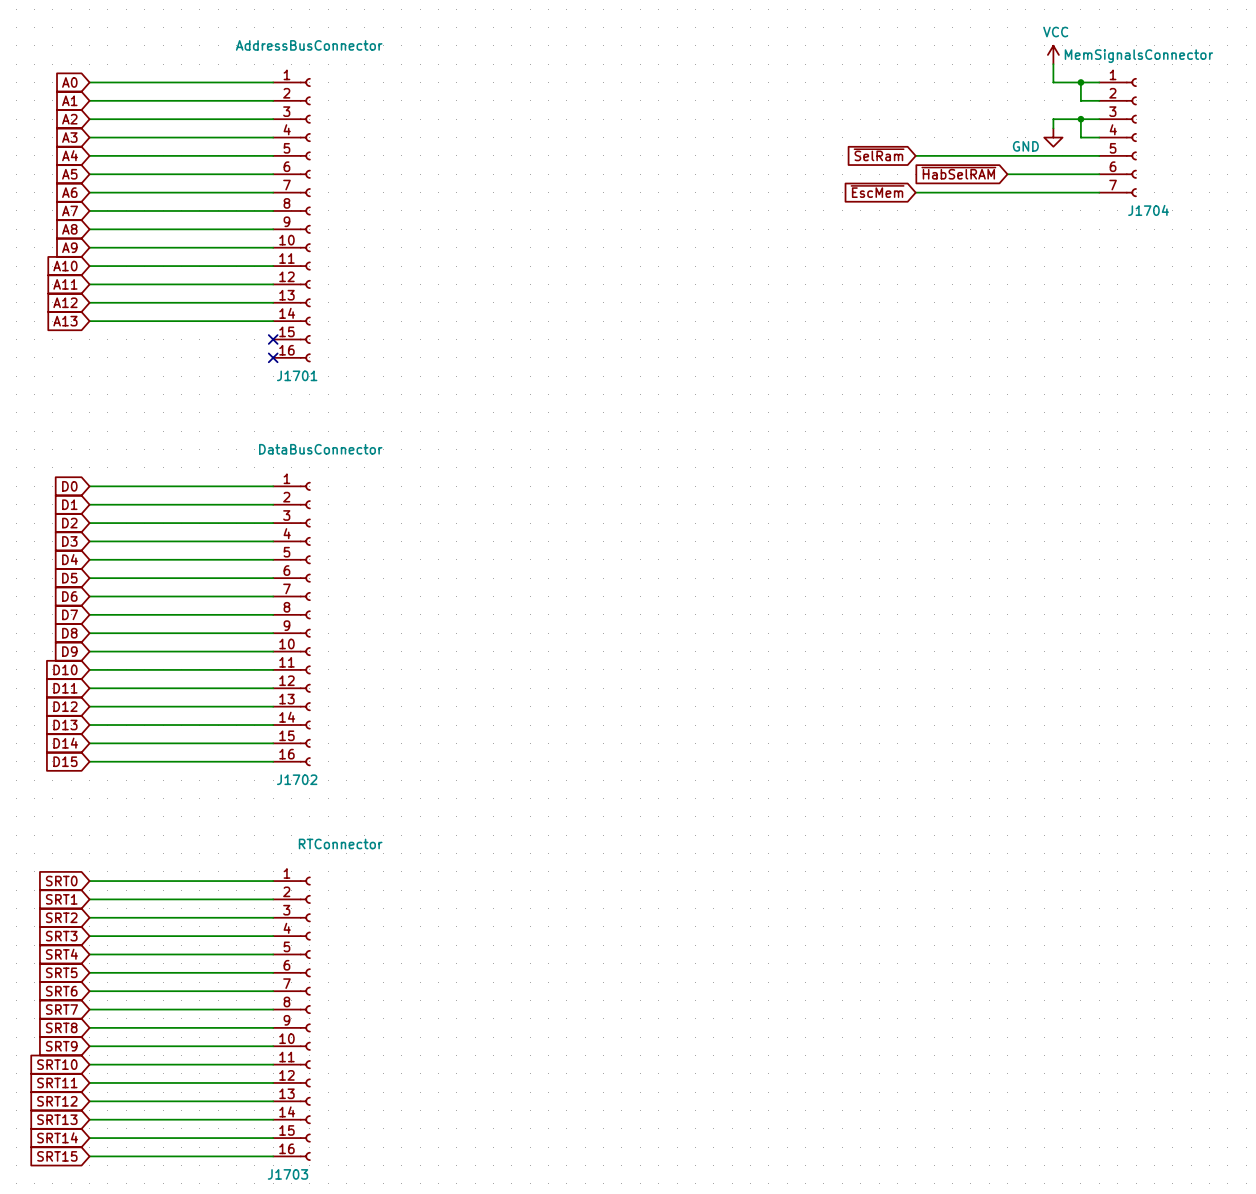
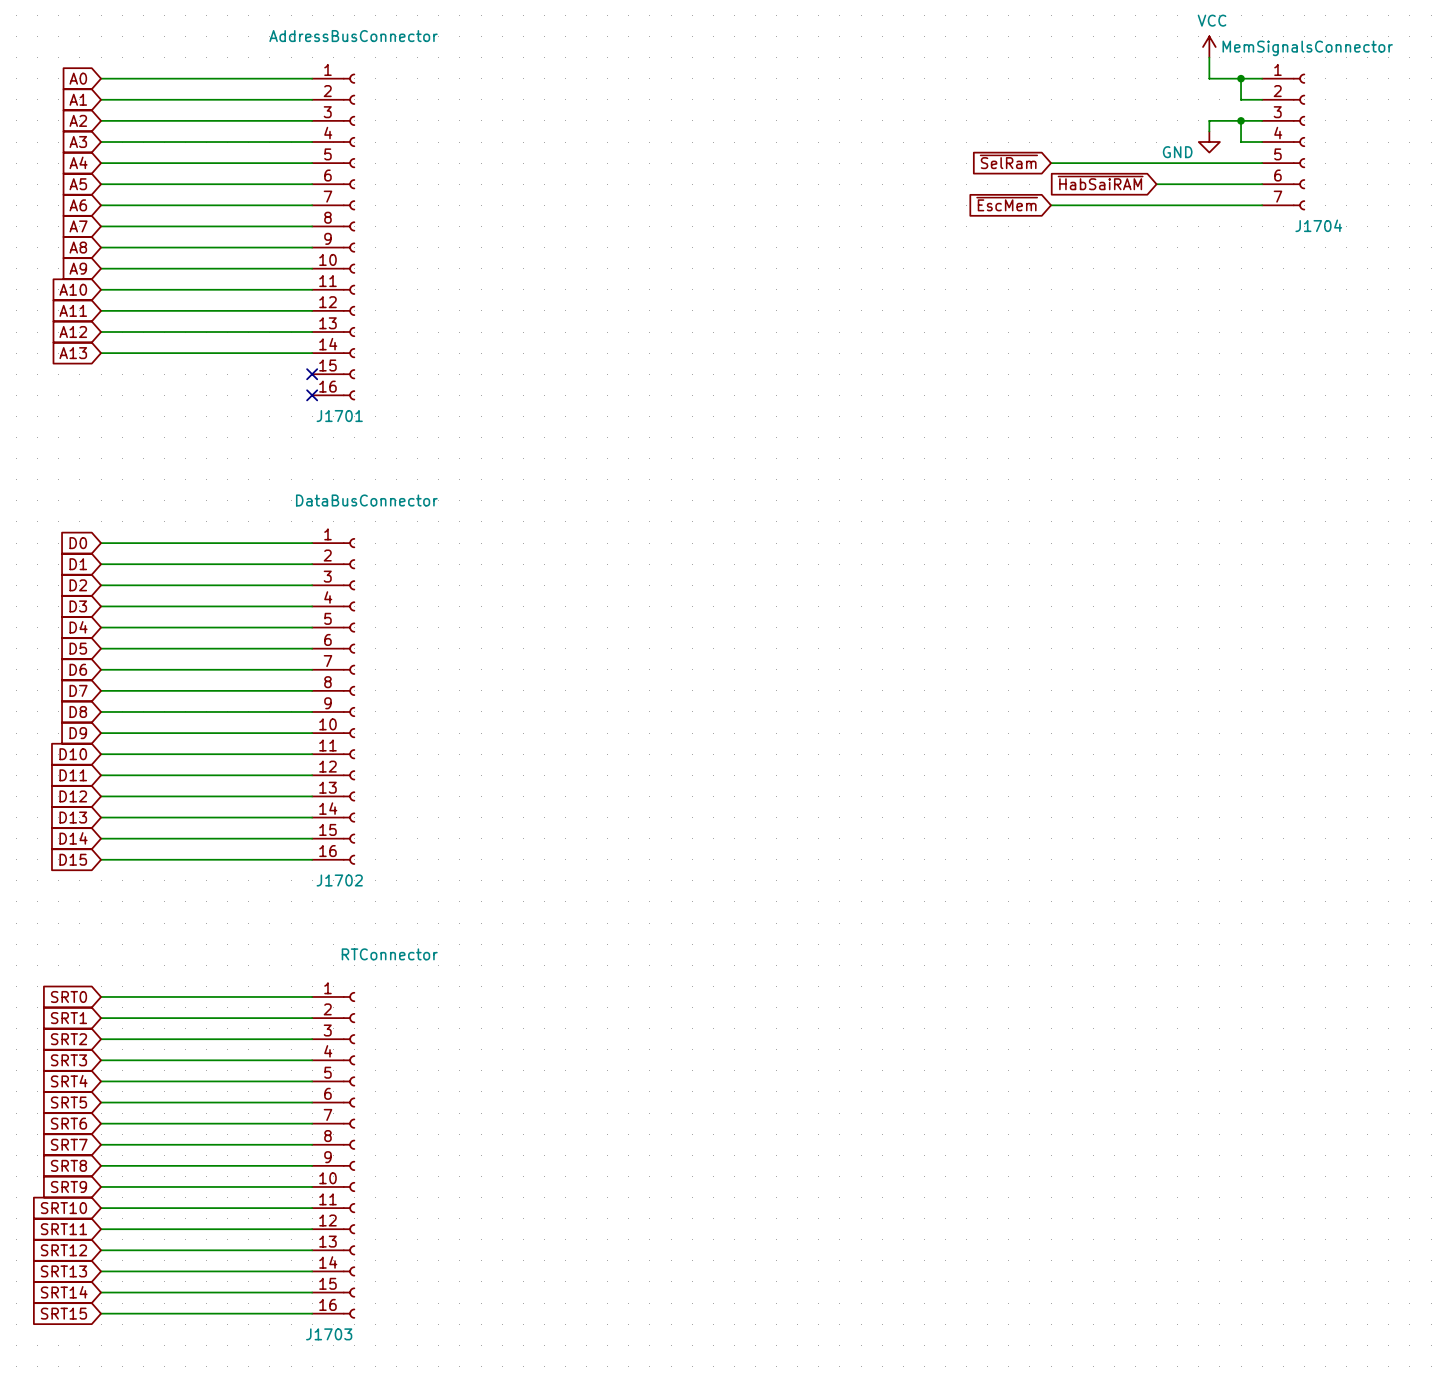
global label: ~{HabSelRAM} (958, 173) -> ~{HabSaiRAM} (1100, 183)

